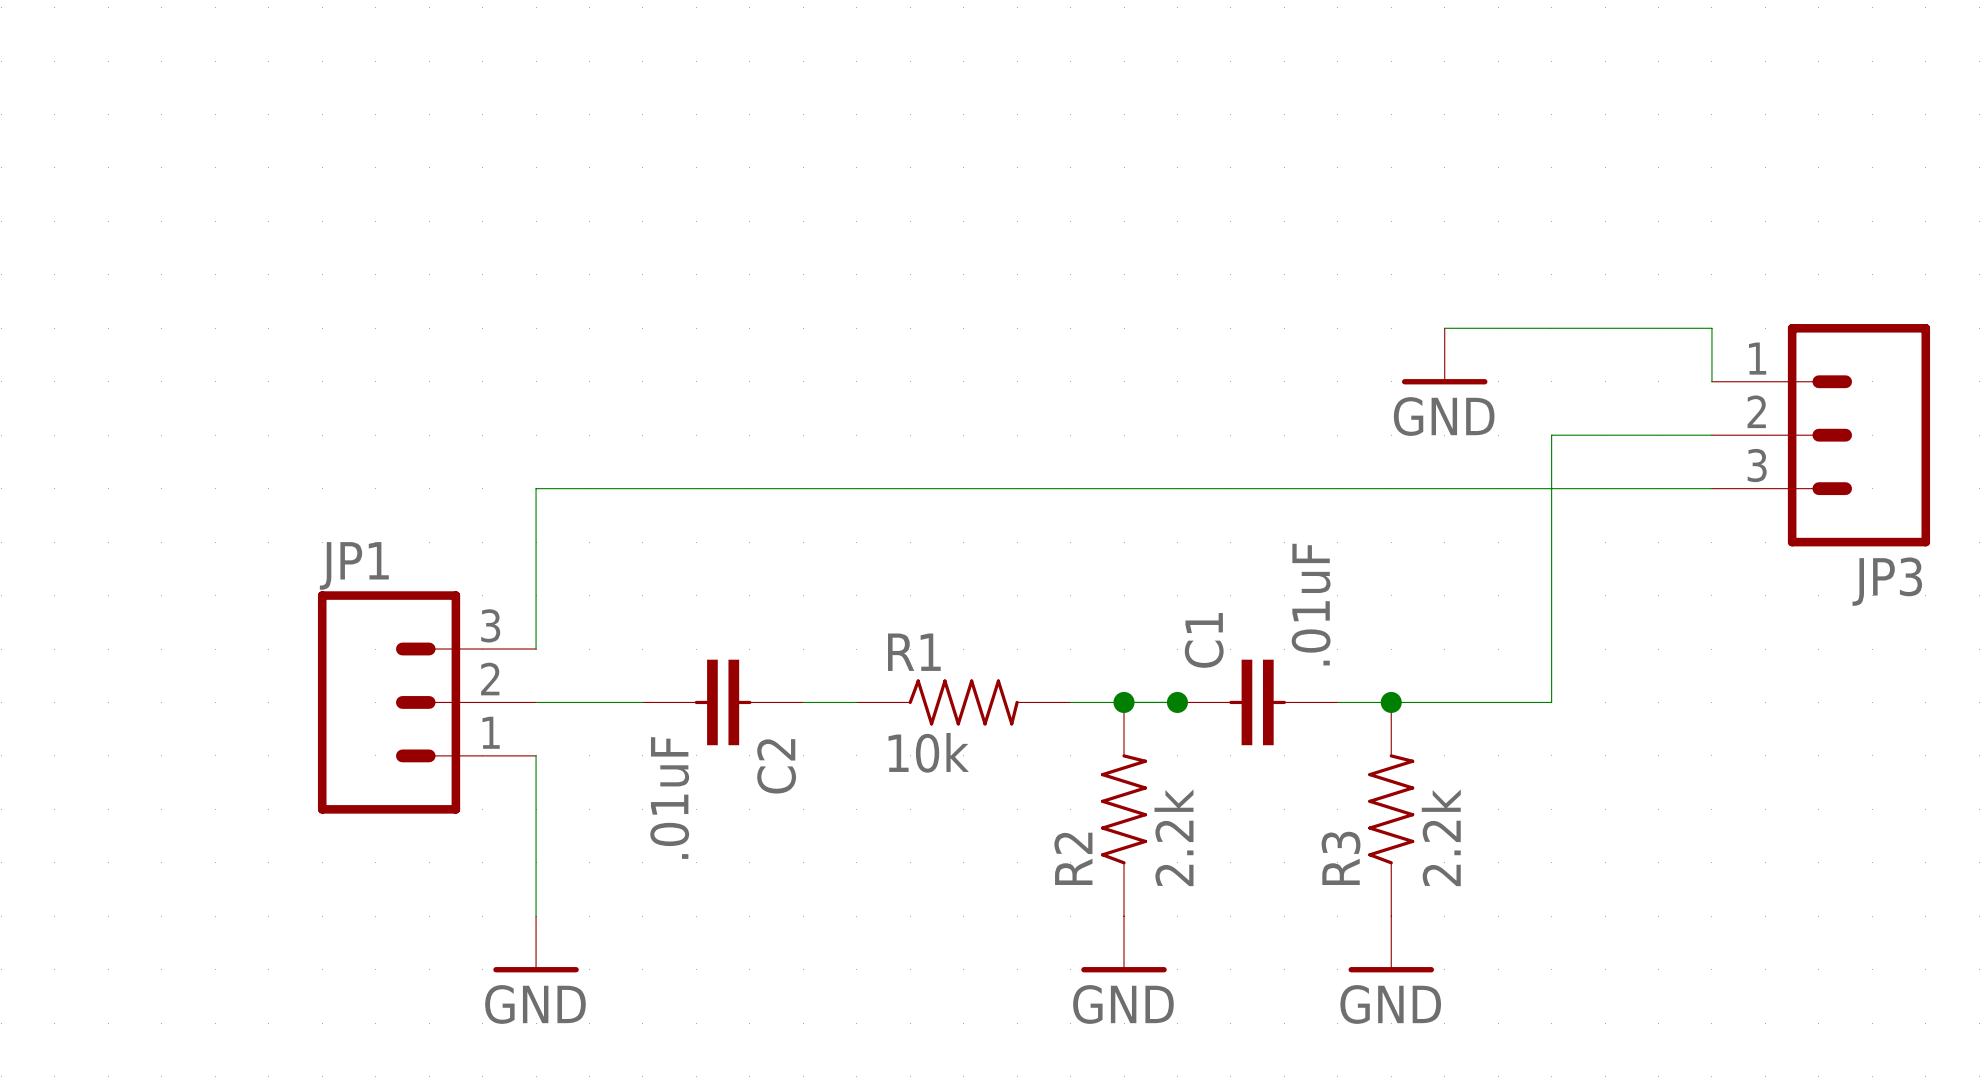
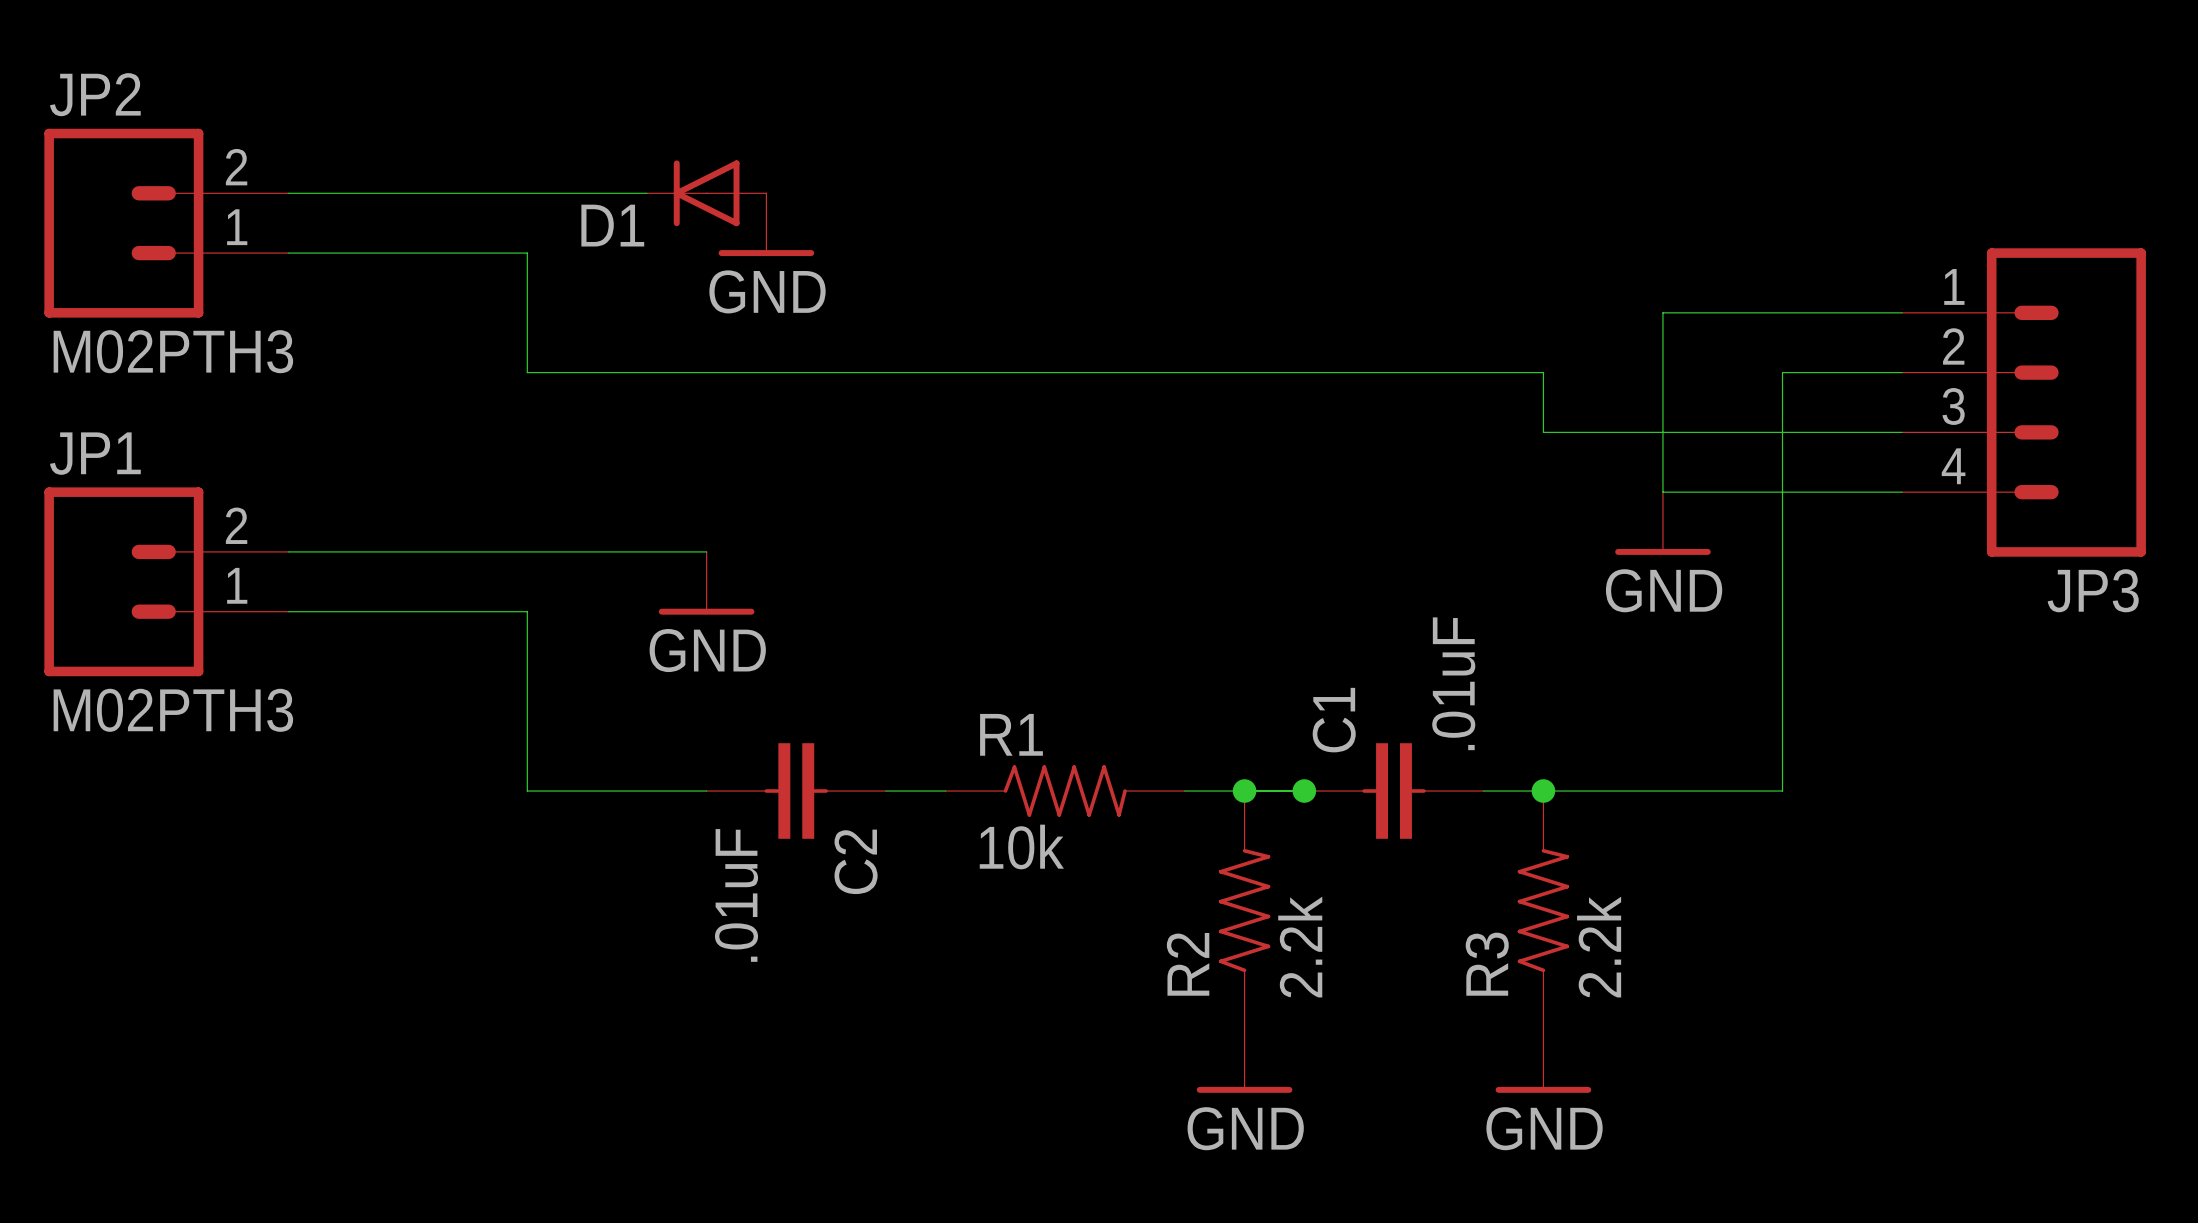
wire: none -> (288, 193) (646, 193)
D1: none -> (706, 193)
JP2: none -> M02PTH3 (166, 223)
power symbol: none -> GND (766, 224)
wire: none -> (1902, 312) (1662, 312) (1662, 492) (1722, 492)
JP3 symbol: [1711, 324, 1931, 547] -> [1902, 248, 2146, 557]
wire: (1444, 328) (1605, 328) -> none
wire: (1711, 328) (1711, 381) -> (288, 253) (527, 253) (527, 372) (1543, 372) (1543, 432) (1902, 432)
power symbol position: GND (1444, 356) -> GND (1662, 523)
wire: (1551, 435) (1551, 702) -> (1782, 372) (1782, 791) (1722, 791)
wire: (536, 488) (536, 649) -> (587, 551) (288, 551)
wire: (642, 488) (1711, 488) -> none
power symbol: none -> GND (706, 583)
wire: none -> (288, 611) (527, 611) (527, 791) (587, 791)
JP1 symbol: [317, 591, 537, 814] -> [44, 487, 289, 677]
JP1 value: none -> M02PTH3 (173, 710)
wire: (536, 755) (536, 916) -> none
power symbol: GND (536, 944) -> none

